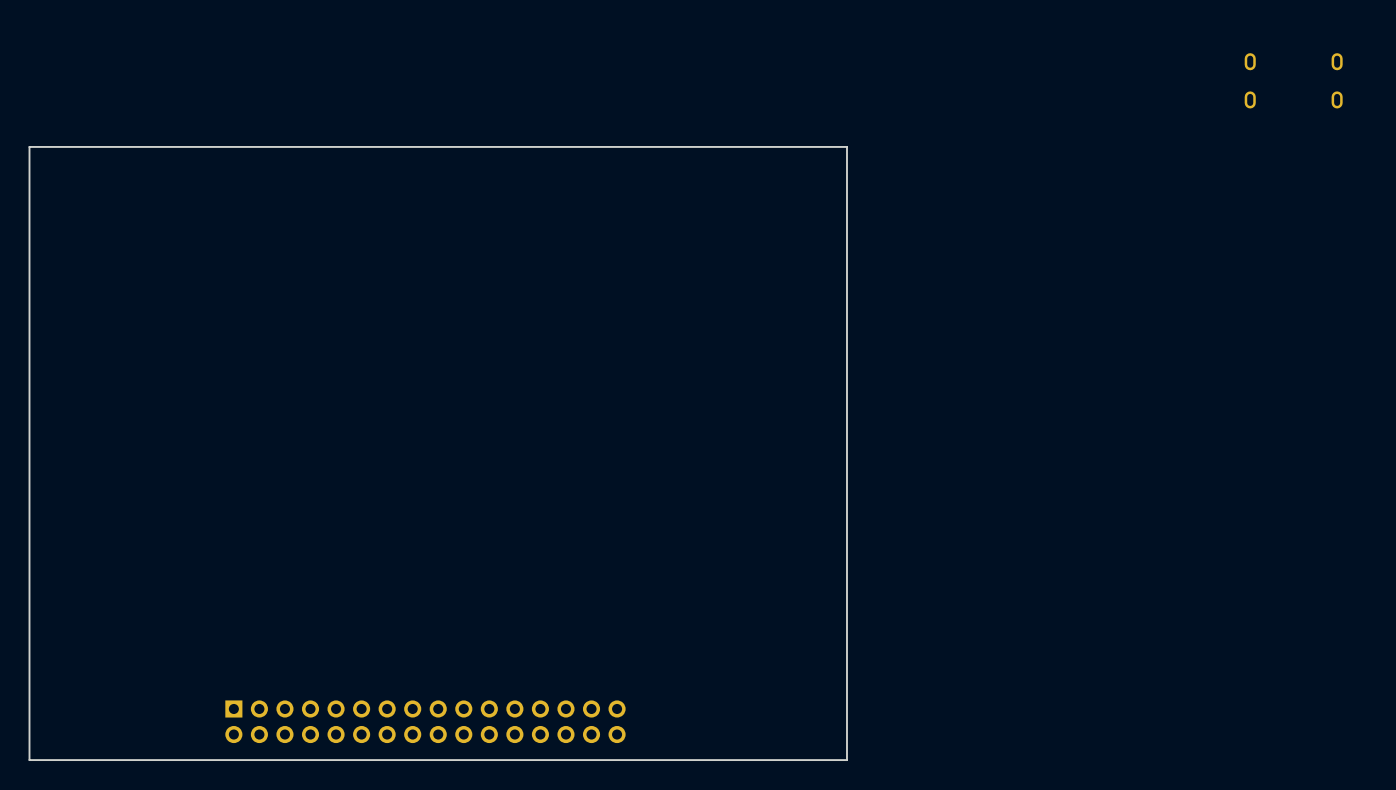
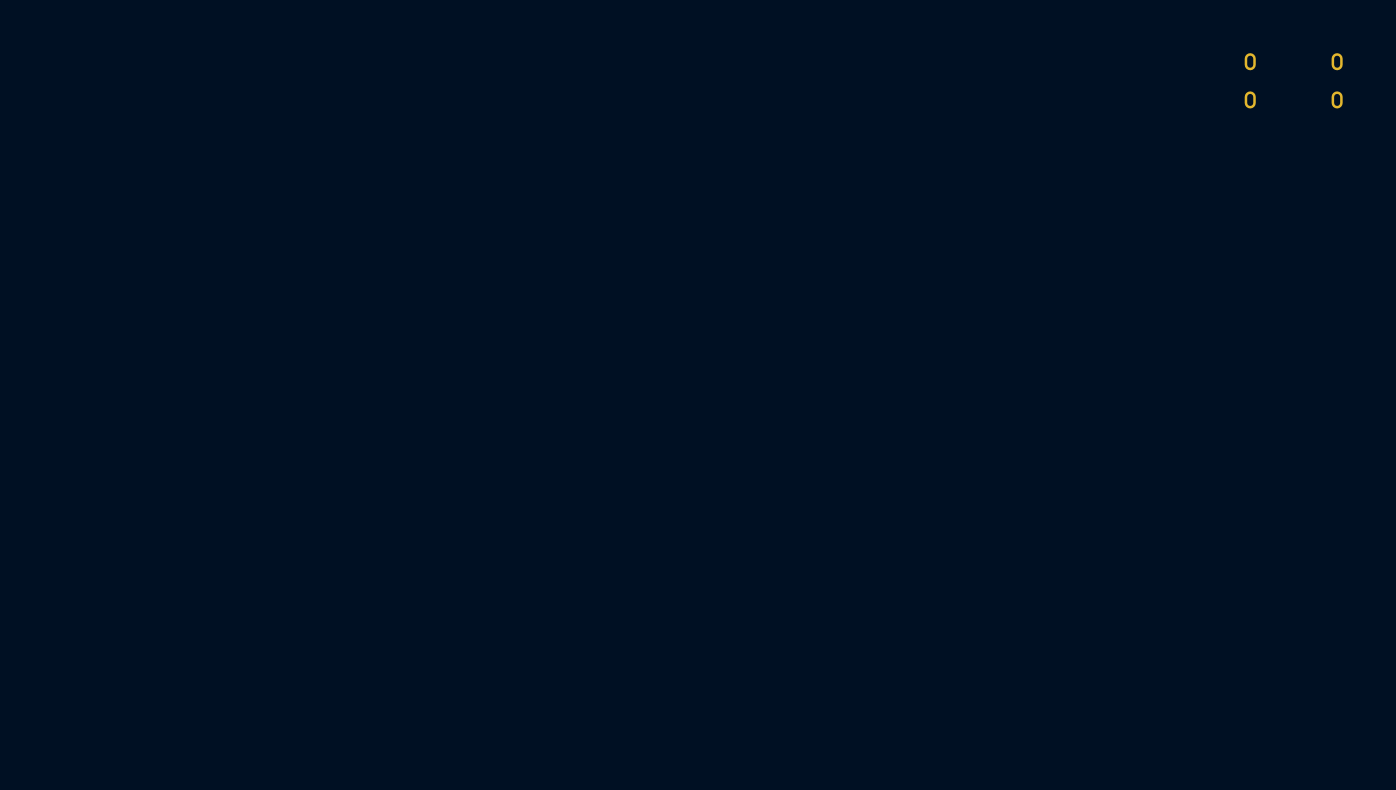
board edge: (846, 146) (846, 760) (29, 760) (29, 146) (846, 146) -> none
part: (425, 721) -> none

